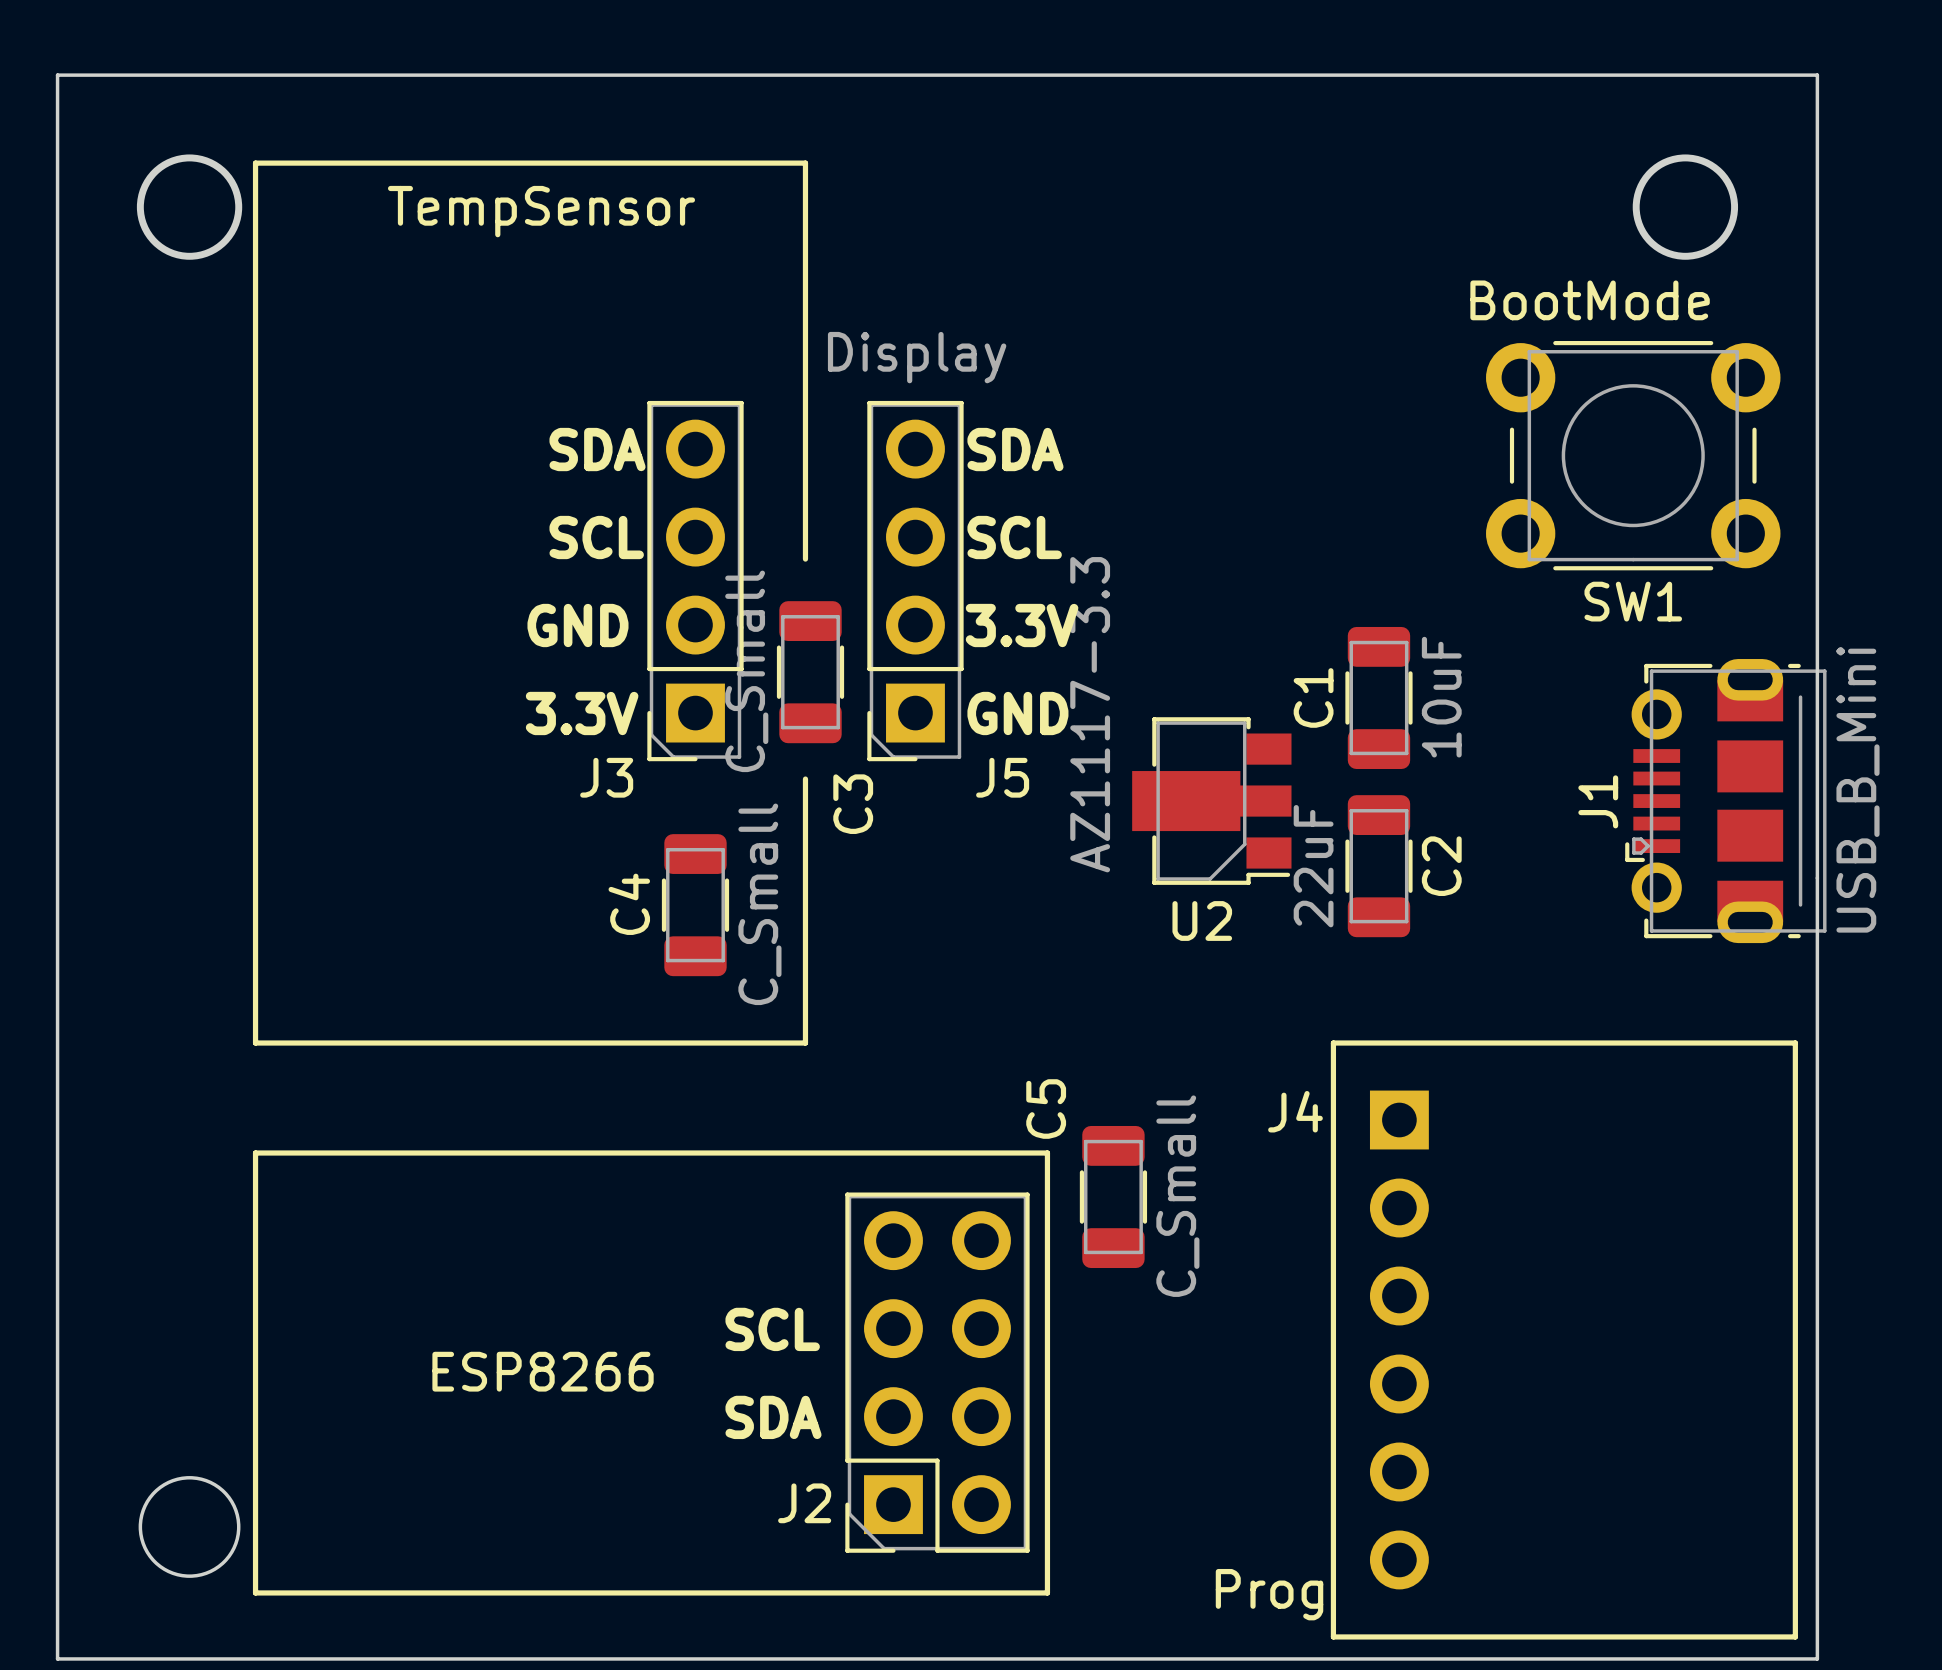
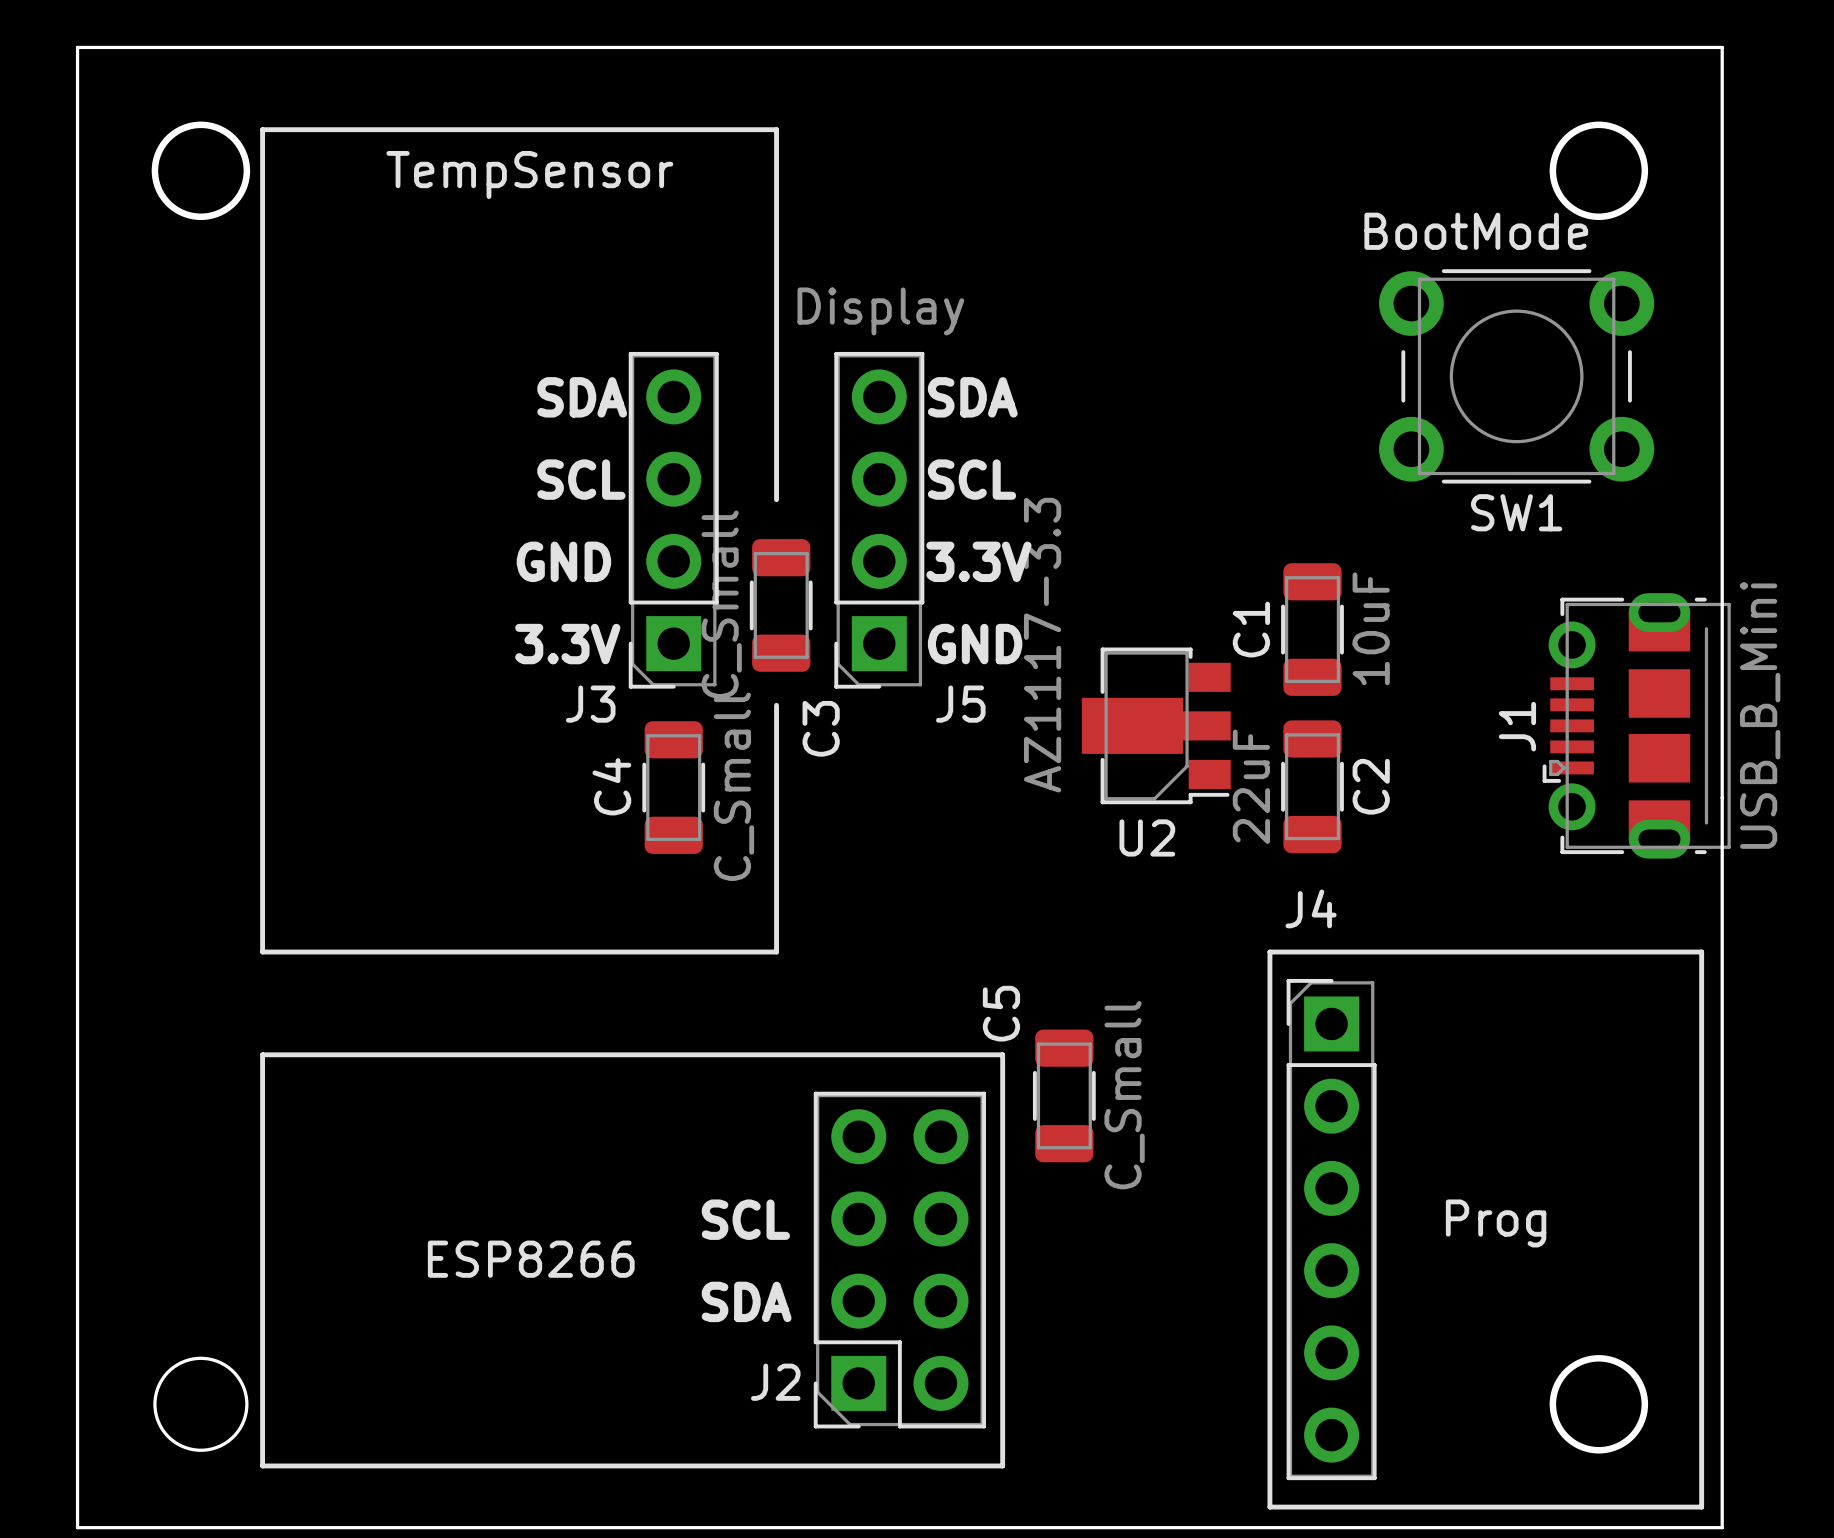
SW1 position: (1633, 455) -> (1516, 376)
C4 position: (695, 905) -> (673, 787)
J4 side: bottom (1399, 1339) -> top (1331, 1229)
round board edge: none -> [1549, 1355, 1649, 1454]

